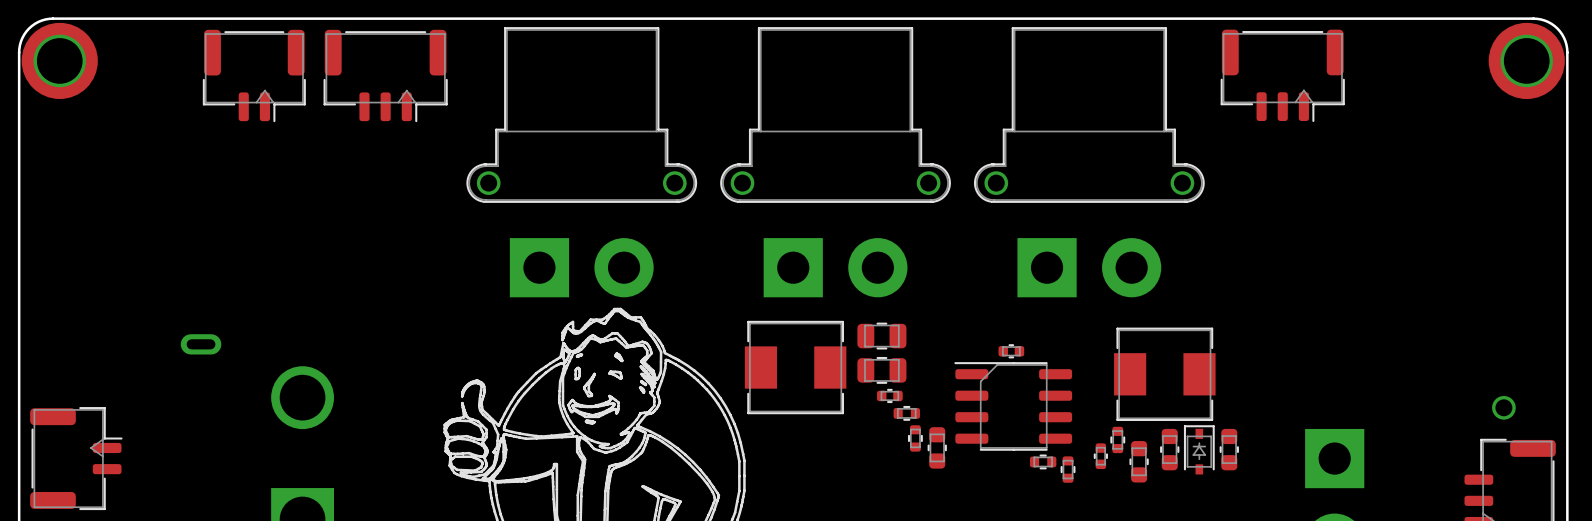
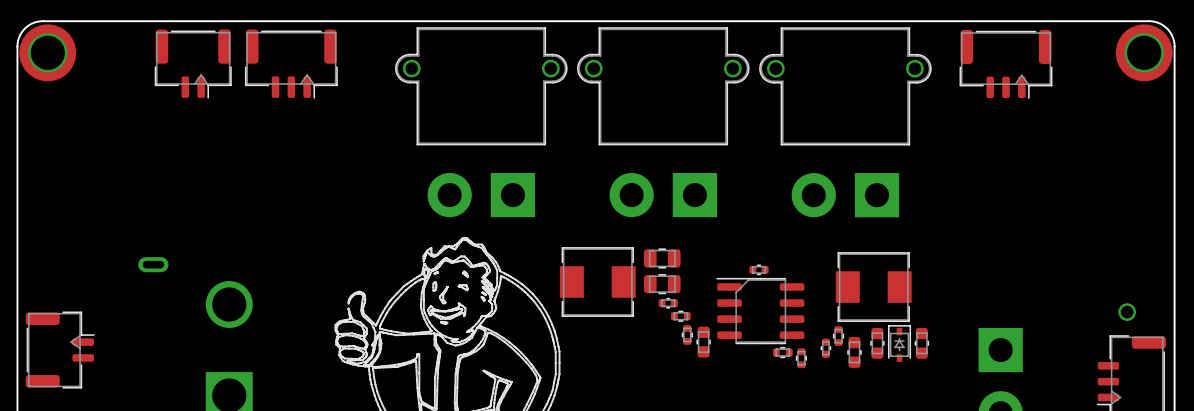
part position: (1282, 75) -> (1006, 64)
part: none -> (481, 122)
part: none -> (663, 122)
part: none -> (845, 122)
part: (581, 162) -> none
part: (835, 162) -> none
part: (1089, 162) -> none

